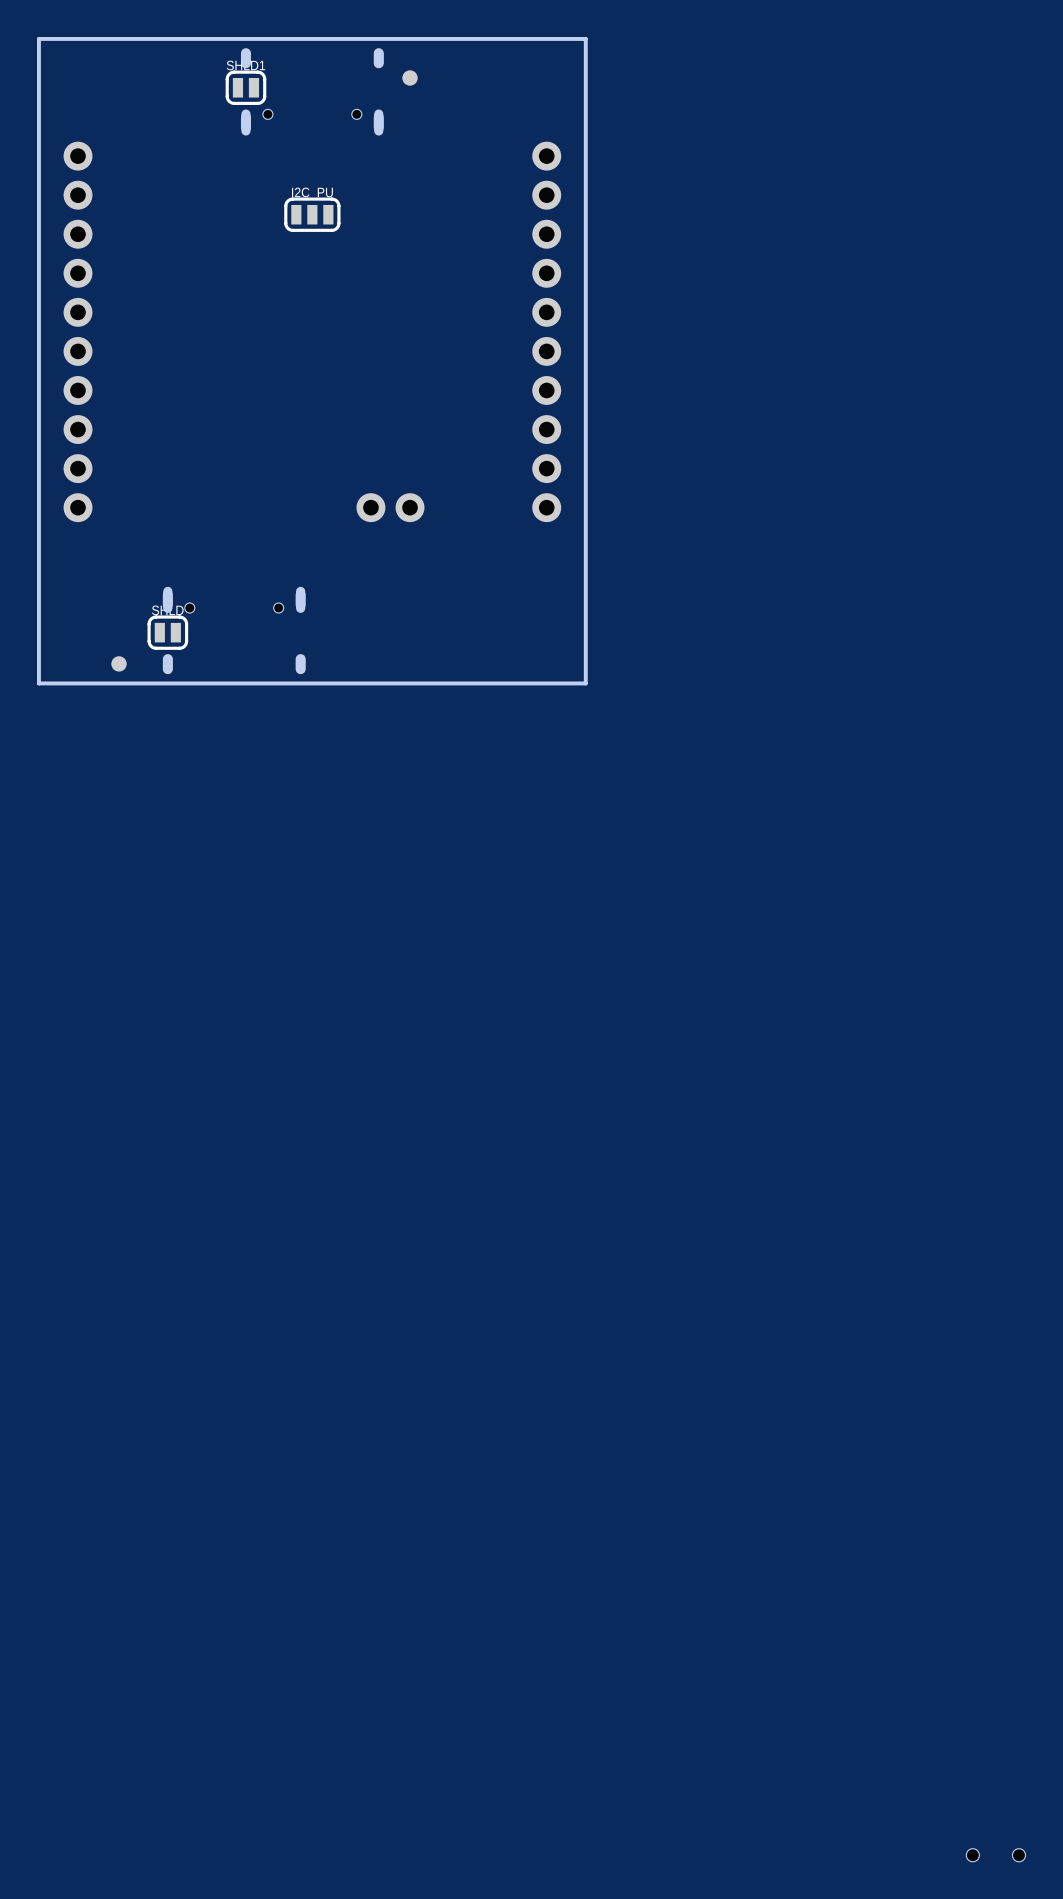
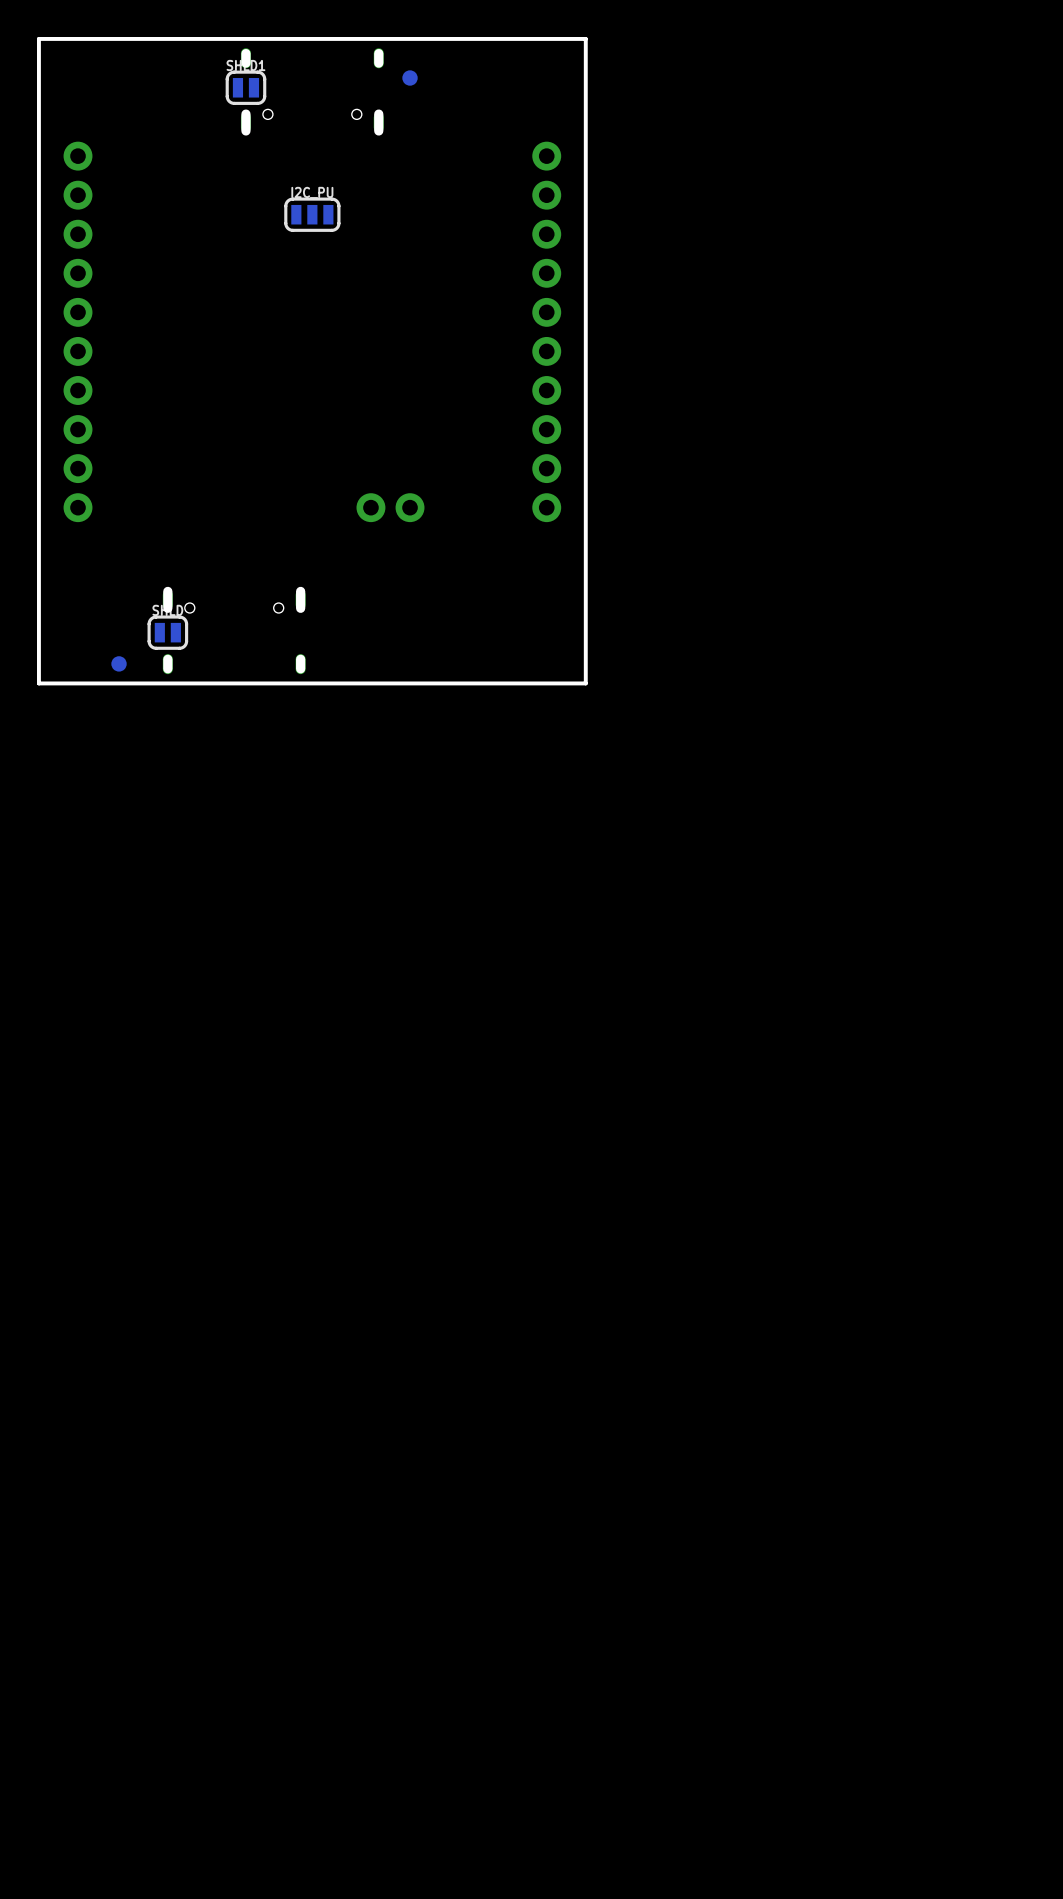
part: (995, 1855) -> none

